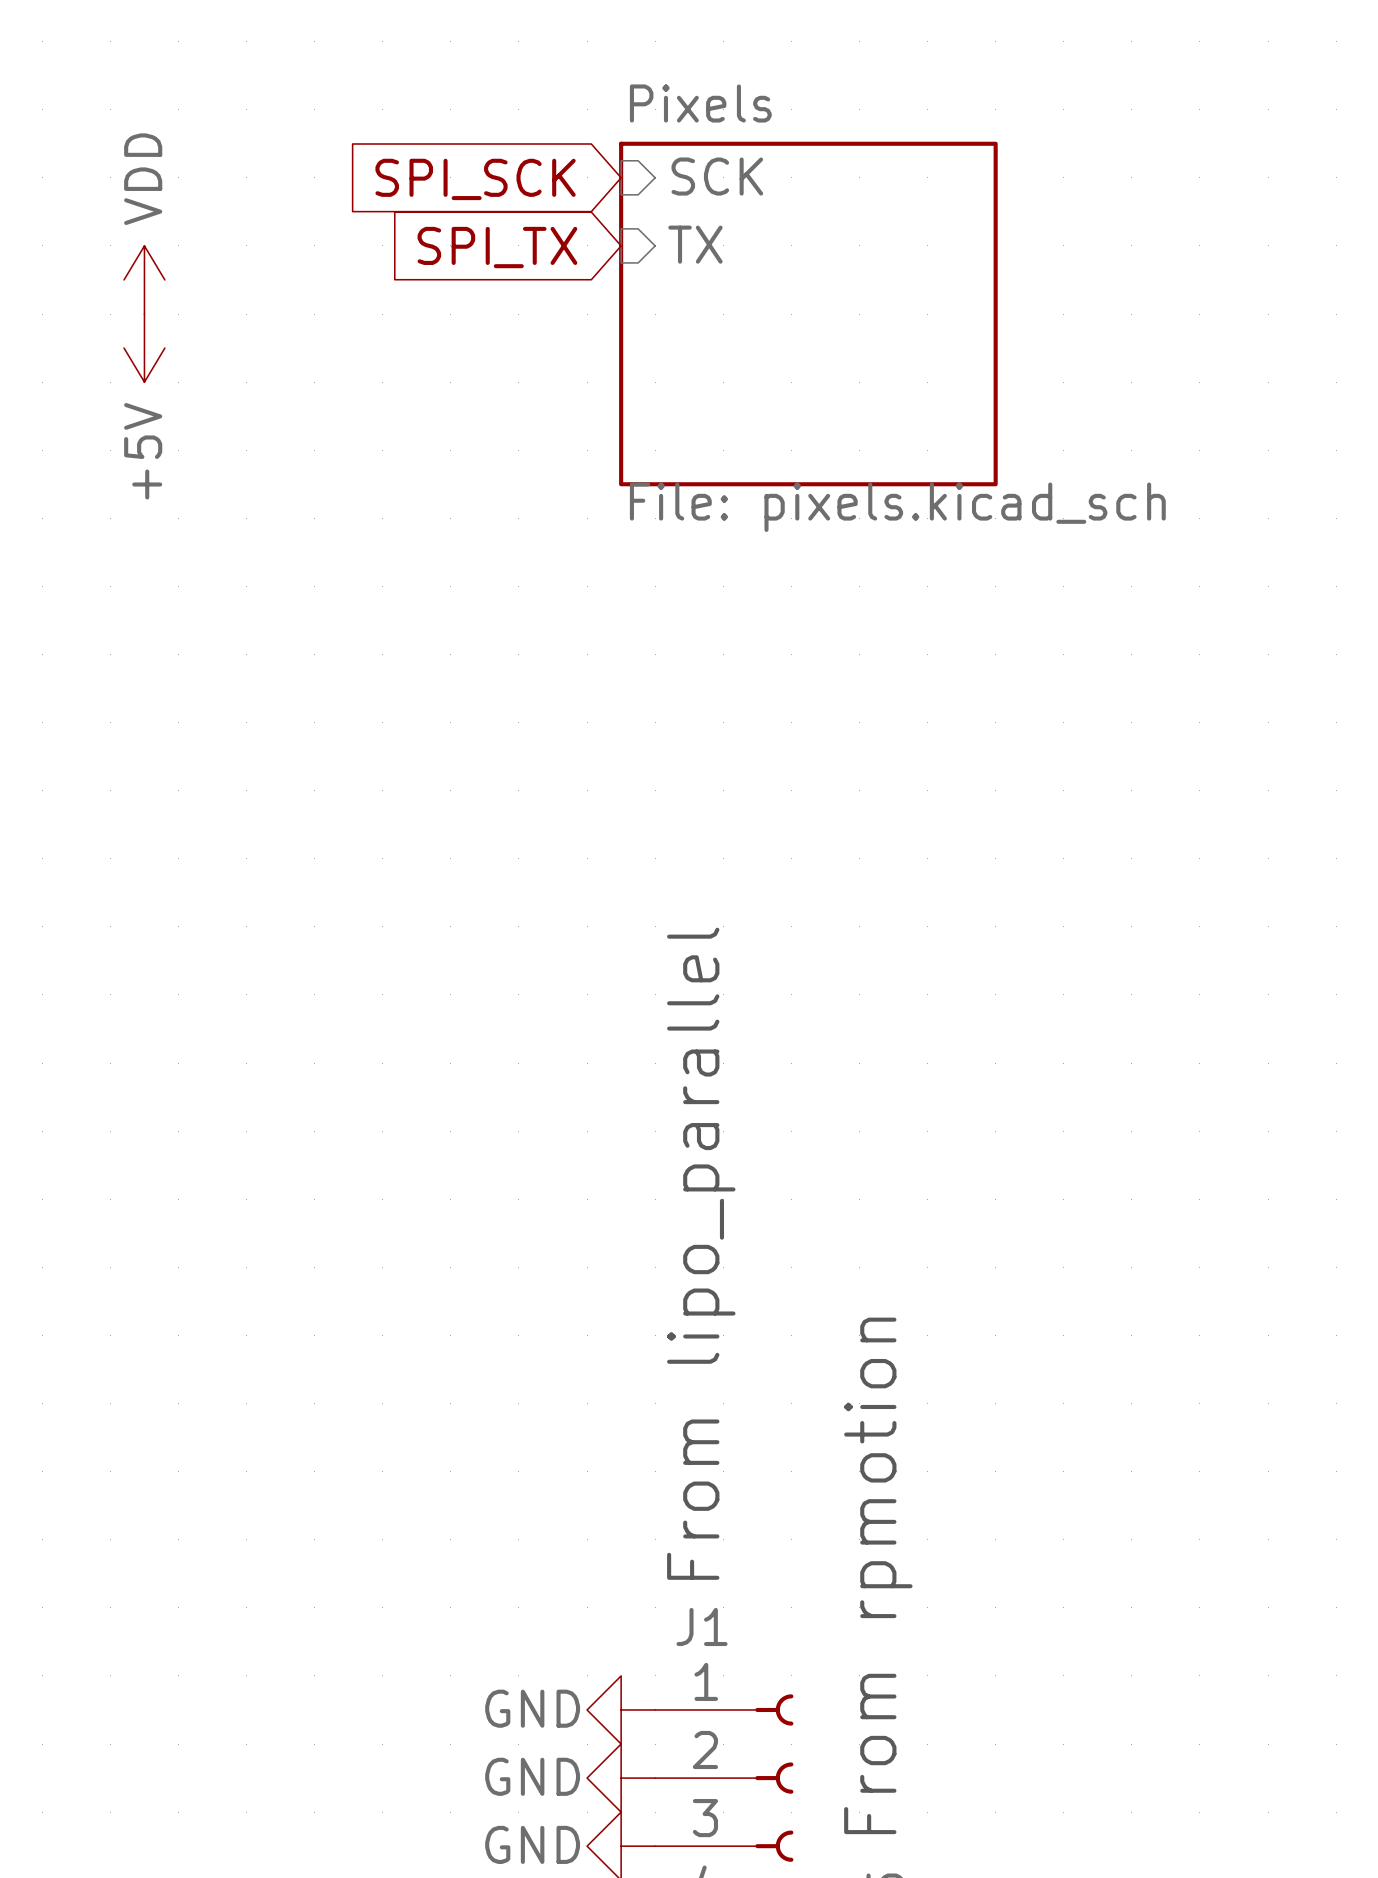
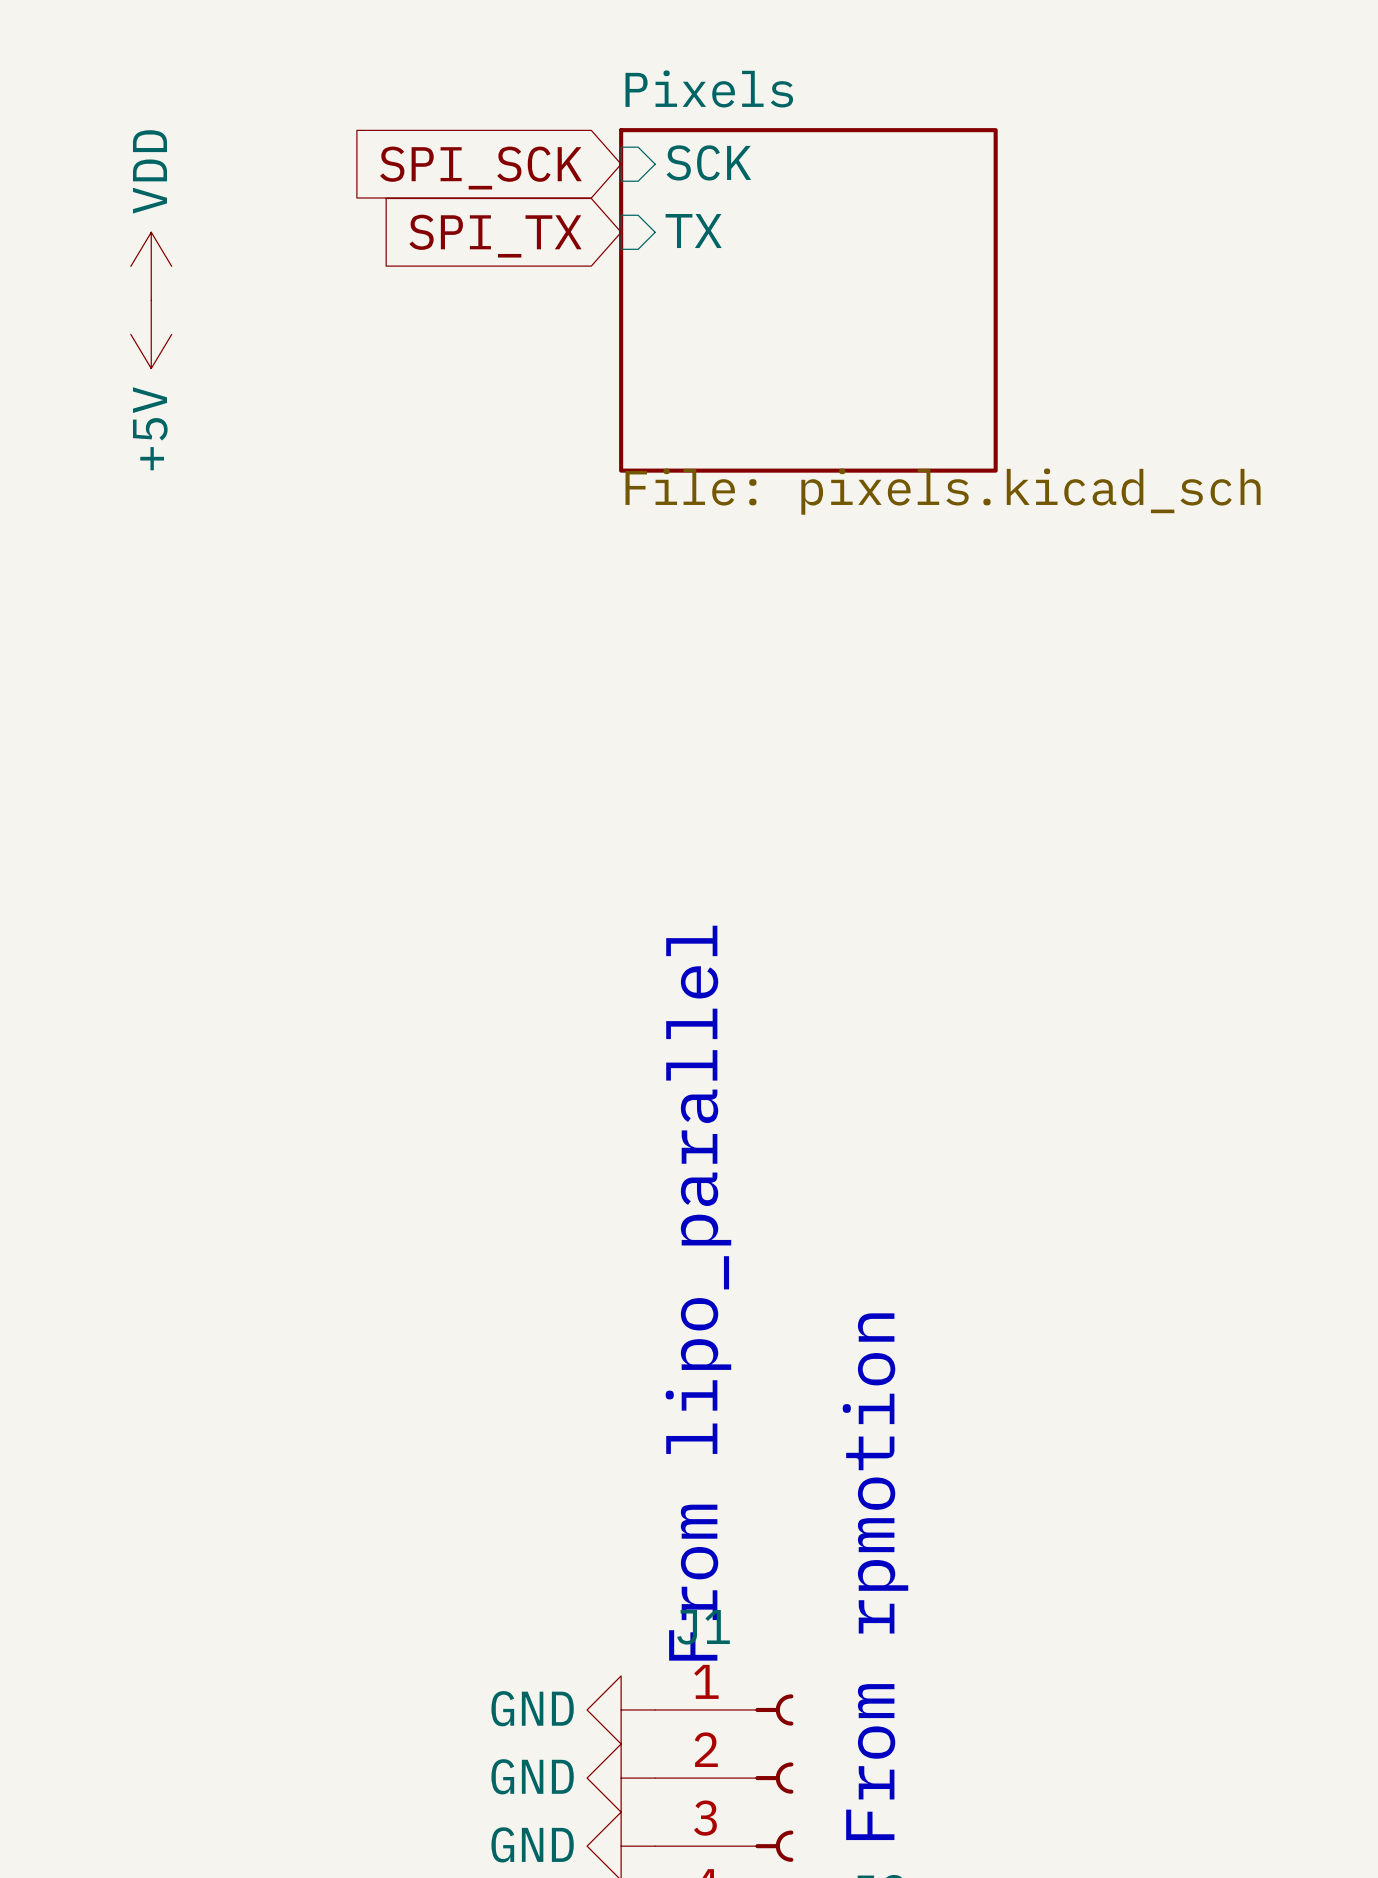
sheet pin position: SCK (717, 176) -> SCK (708, 162)
global label position: SPI_SCK (475, 179) -> SPI_SCK (480, 168)
sheet pin position: TX (695, 244) -> TX (693, 231)
global label position: SPI_TX (497, 247) -> SPI_TX (495, 236)
power symbol position: VDD (144, 279) -> VDD (151, 266)
sheet Pixels position: (808, 314) -> (808, 300)
power symbol position: +5V (144, 348) -> +5V (151, 334)

